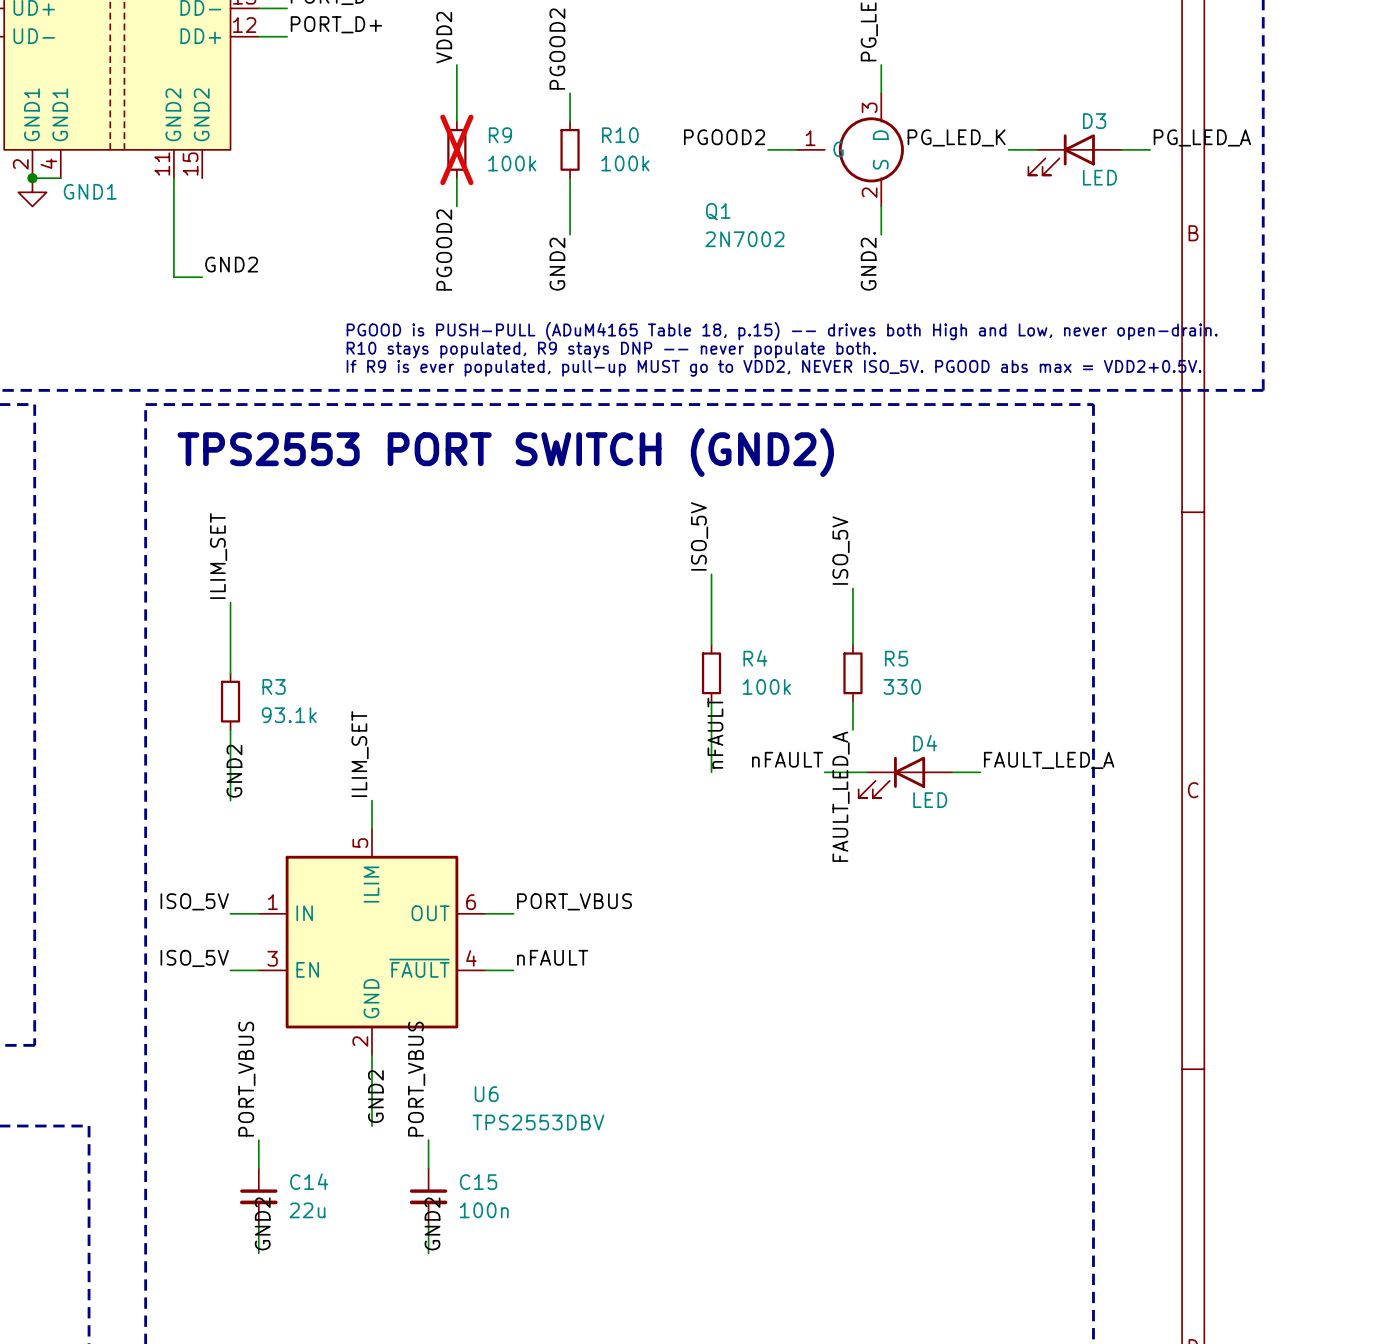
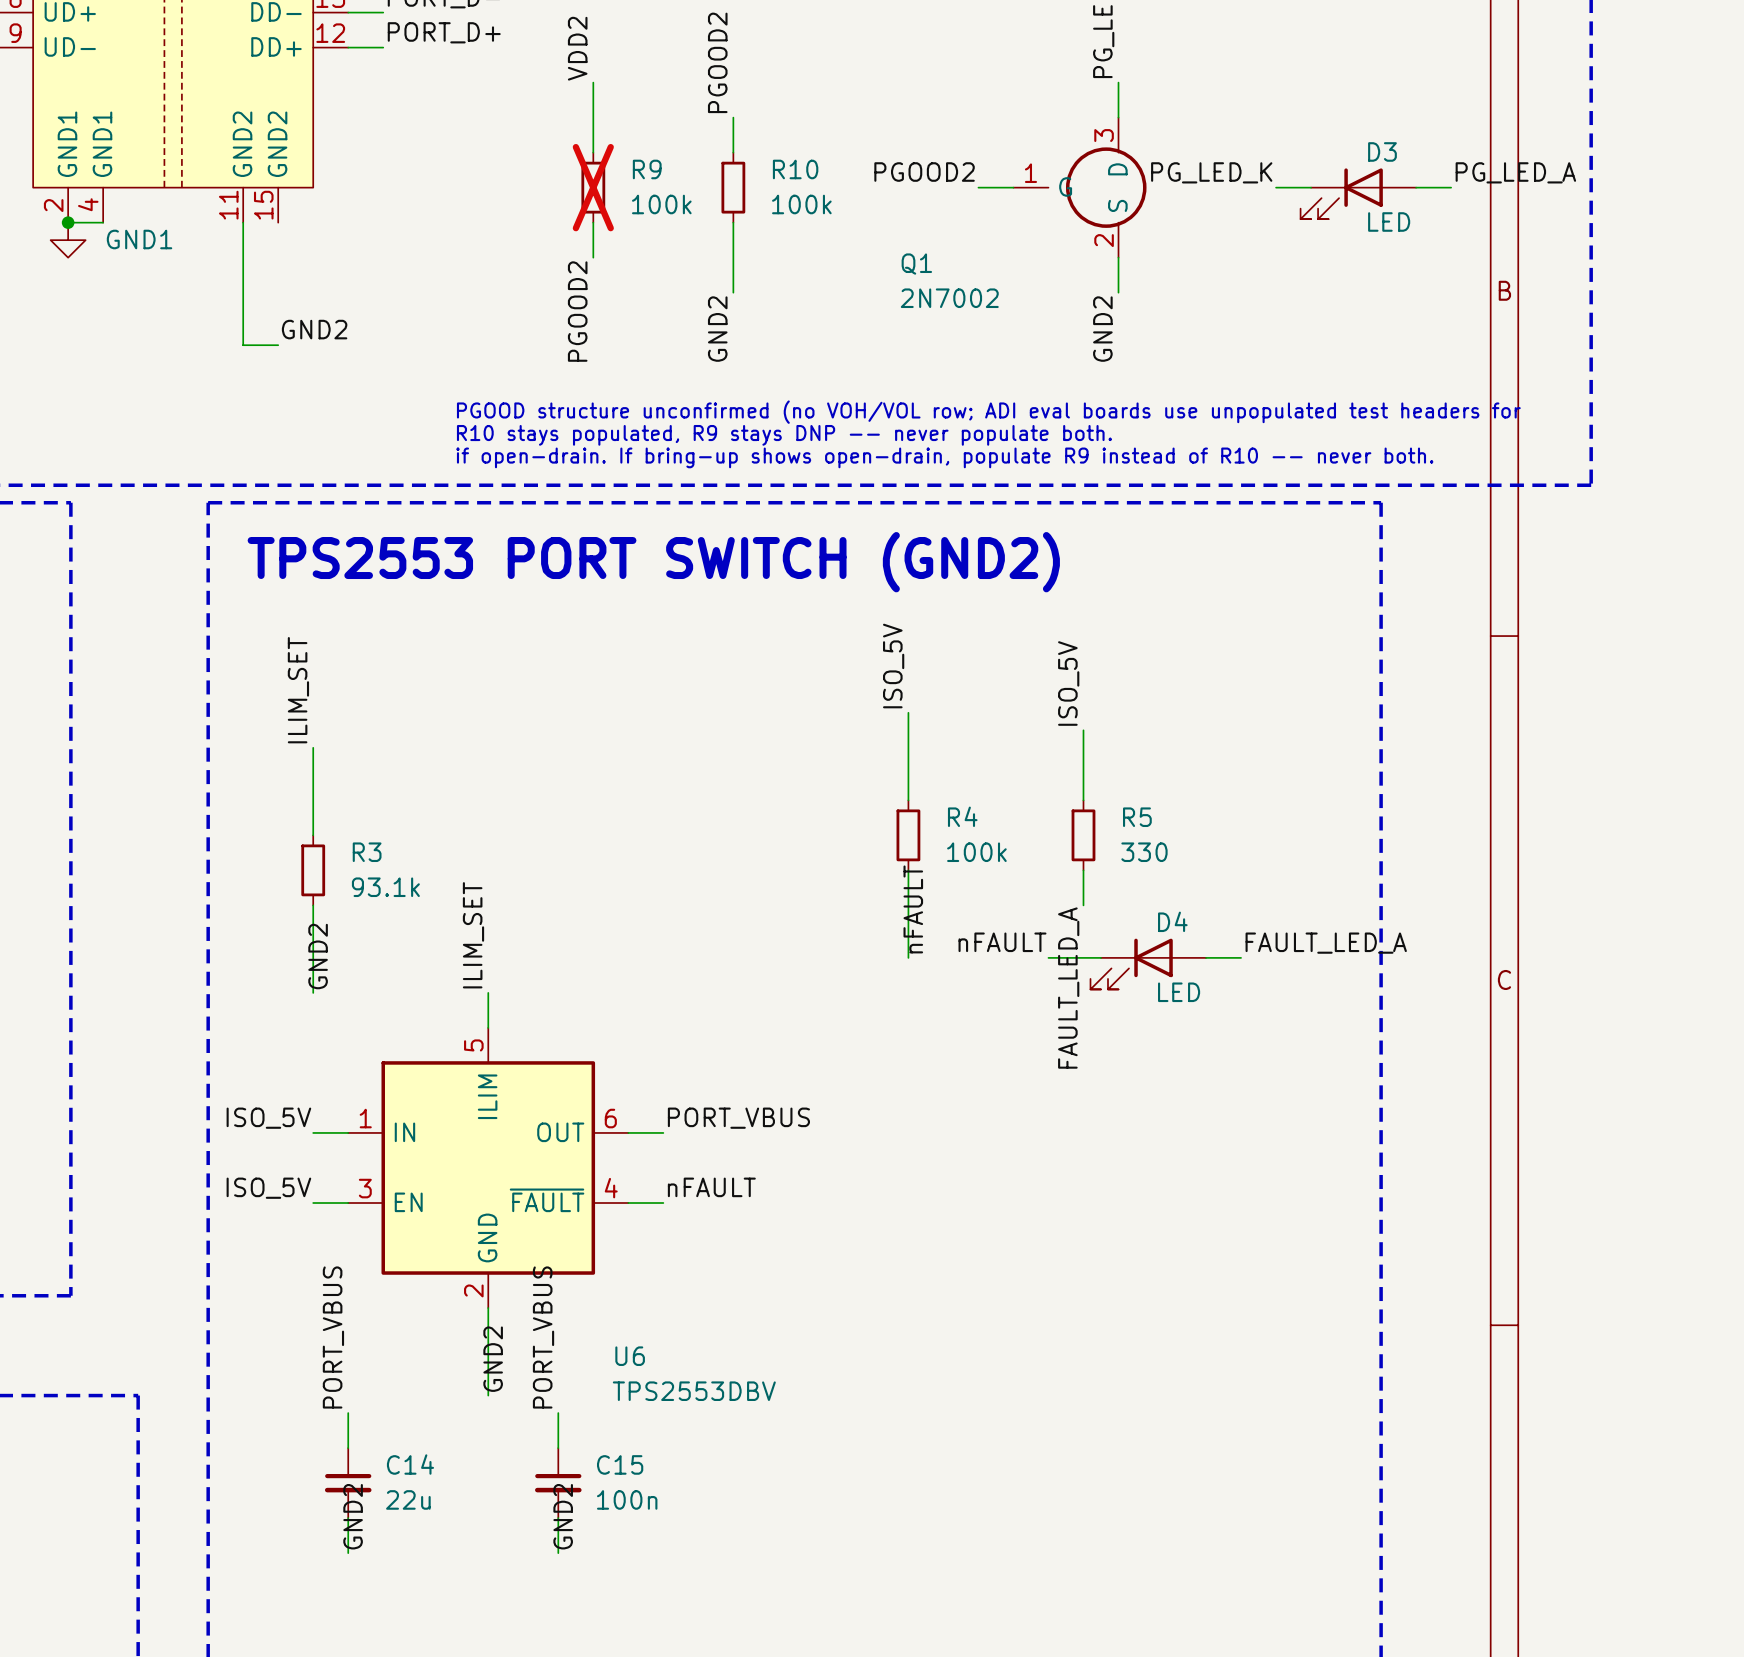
text: PGOOD is PUSH-PULL (ADuM4165 Table 18, p.15) -- drives both High and Low, never open-drain. (782, 331) -> PGOOD structure unconfirmed (no VOH/VOL row; ADI eval boards use unpopulated test headers for (988, 412)
text: If R9 is ever populated, pull-up MUST go to VDD2, NEVER ISO_5V. PGOOD abs max = VDD2+0.5V. (774, 368) -> if open-drain. If bring-up shows open-drain, populate R9 instead of R10 -- never both. (944, 457)

